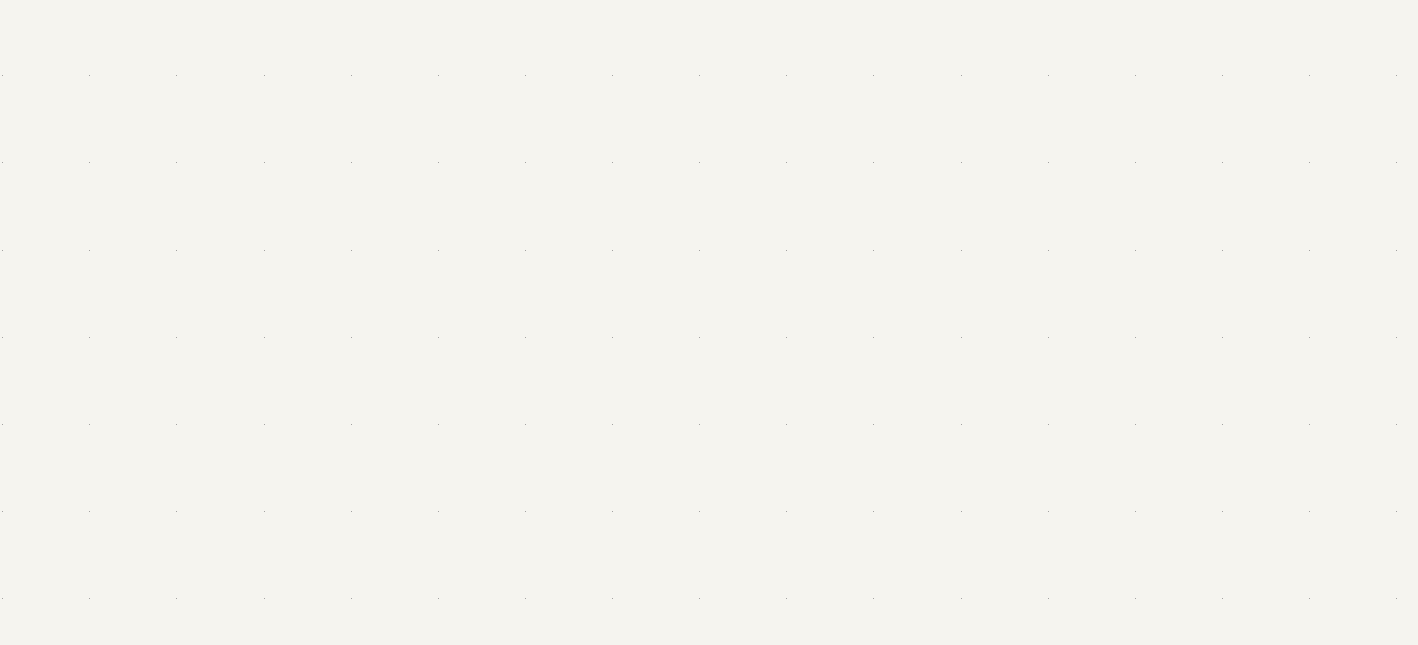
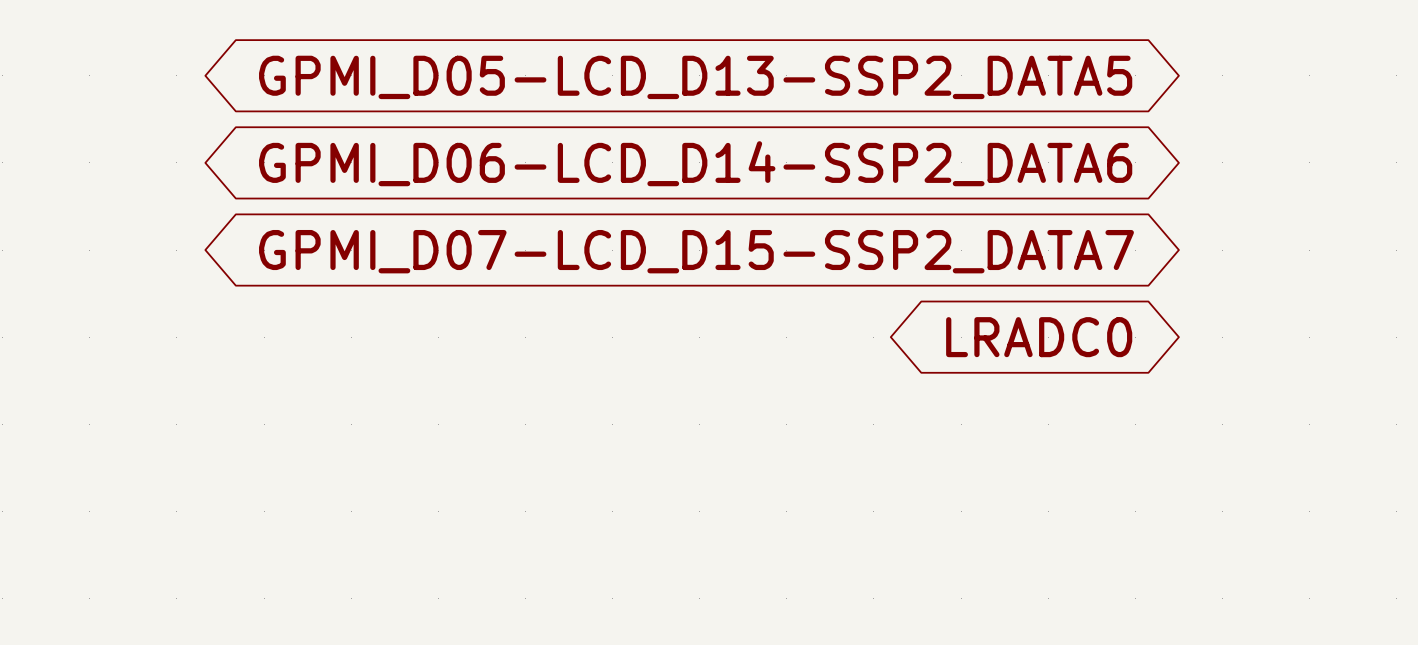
global label: none -> GPMI_D05-LCD_D13-SSP2_DATA5 (695, 77)
global label: none -> GPMI_D06-LCD_D14-SSP2_DATA6 (695, 163)
global label: none -> GPMI_D07-LCD_D15-SSP2_DATA7 (696, 251)
global label: none -> LRADC0 (1039, 337)

